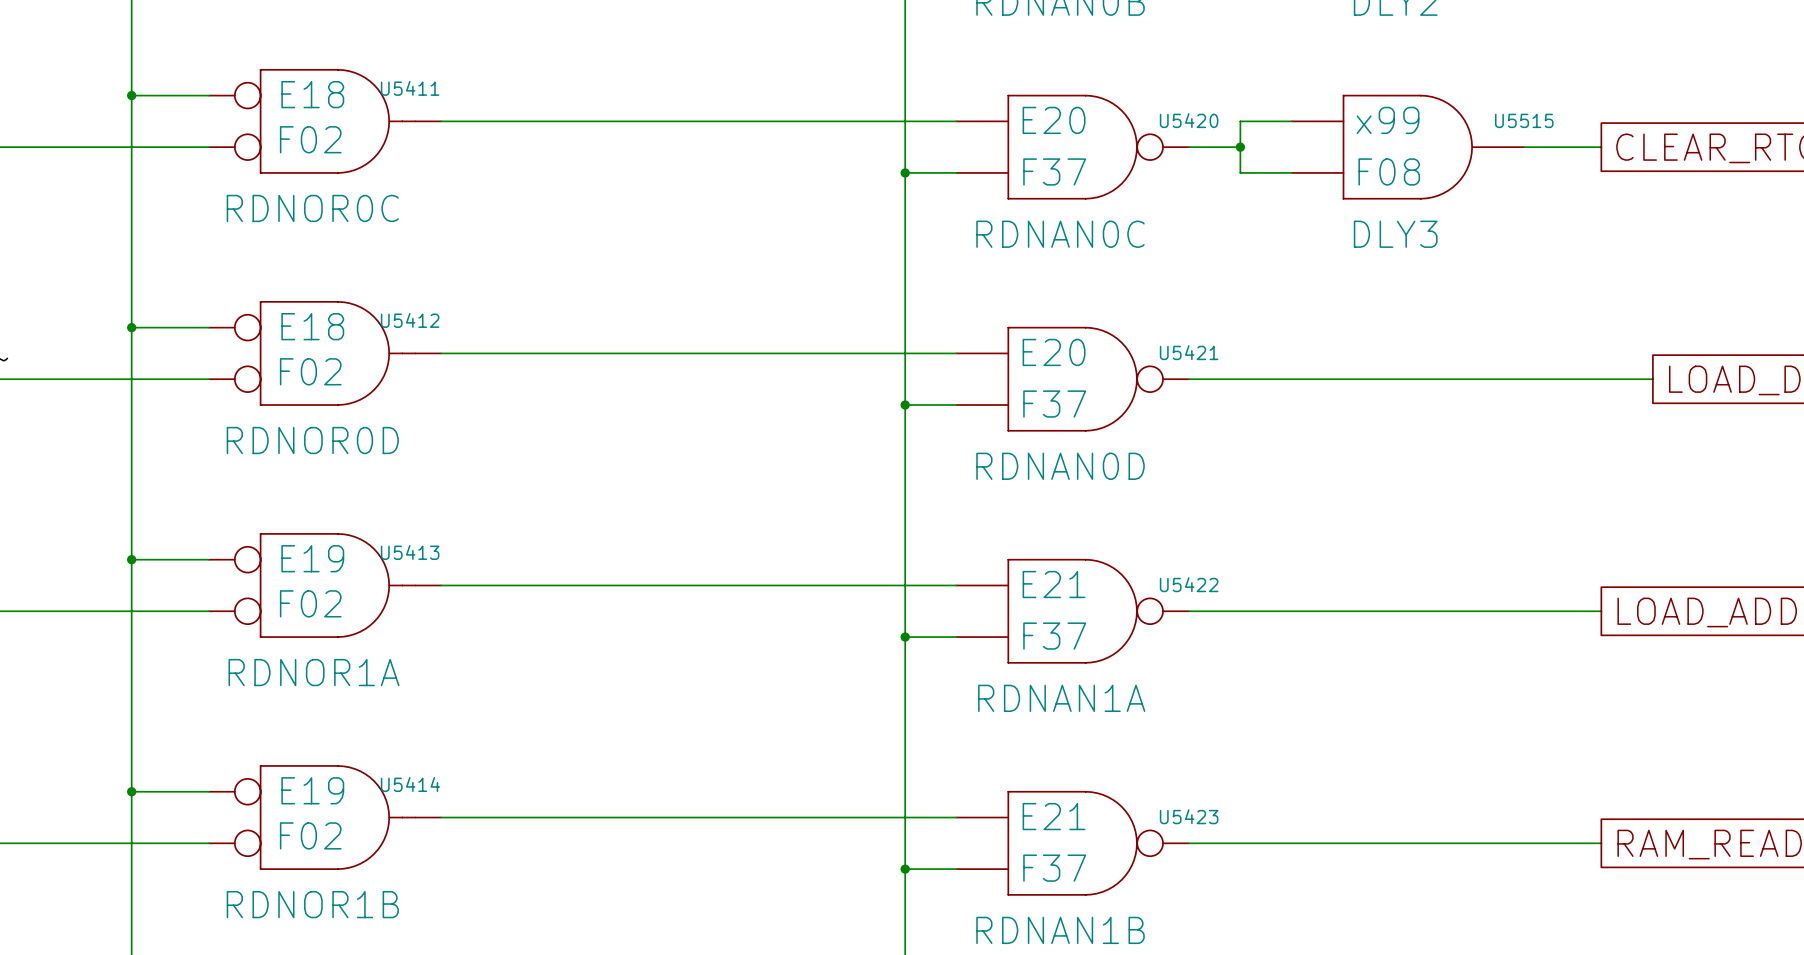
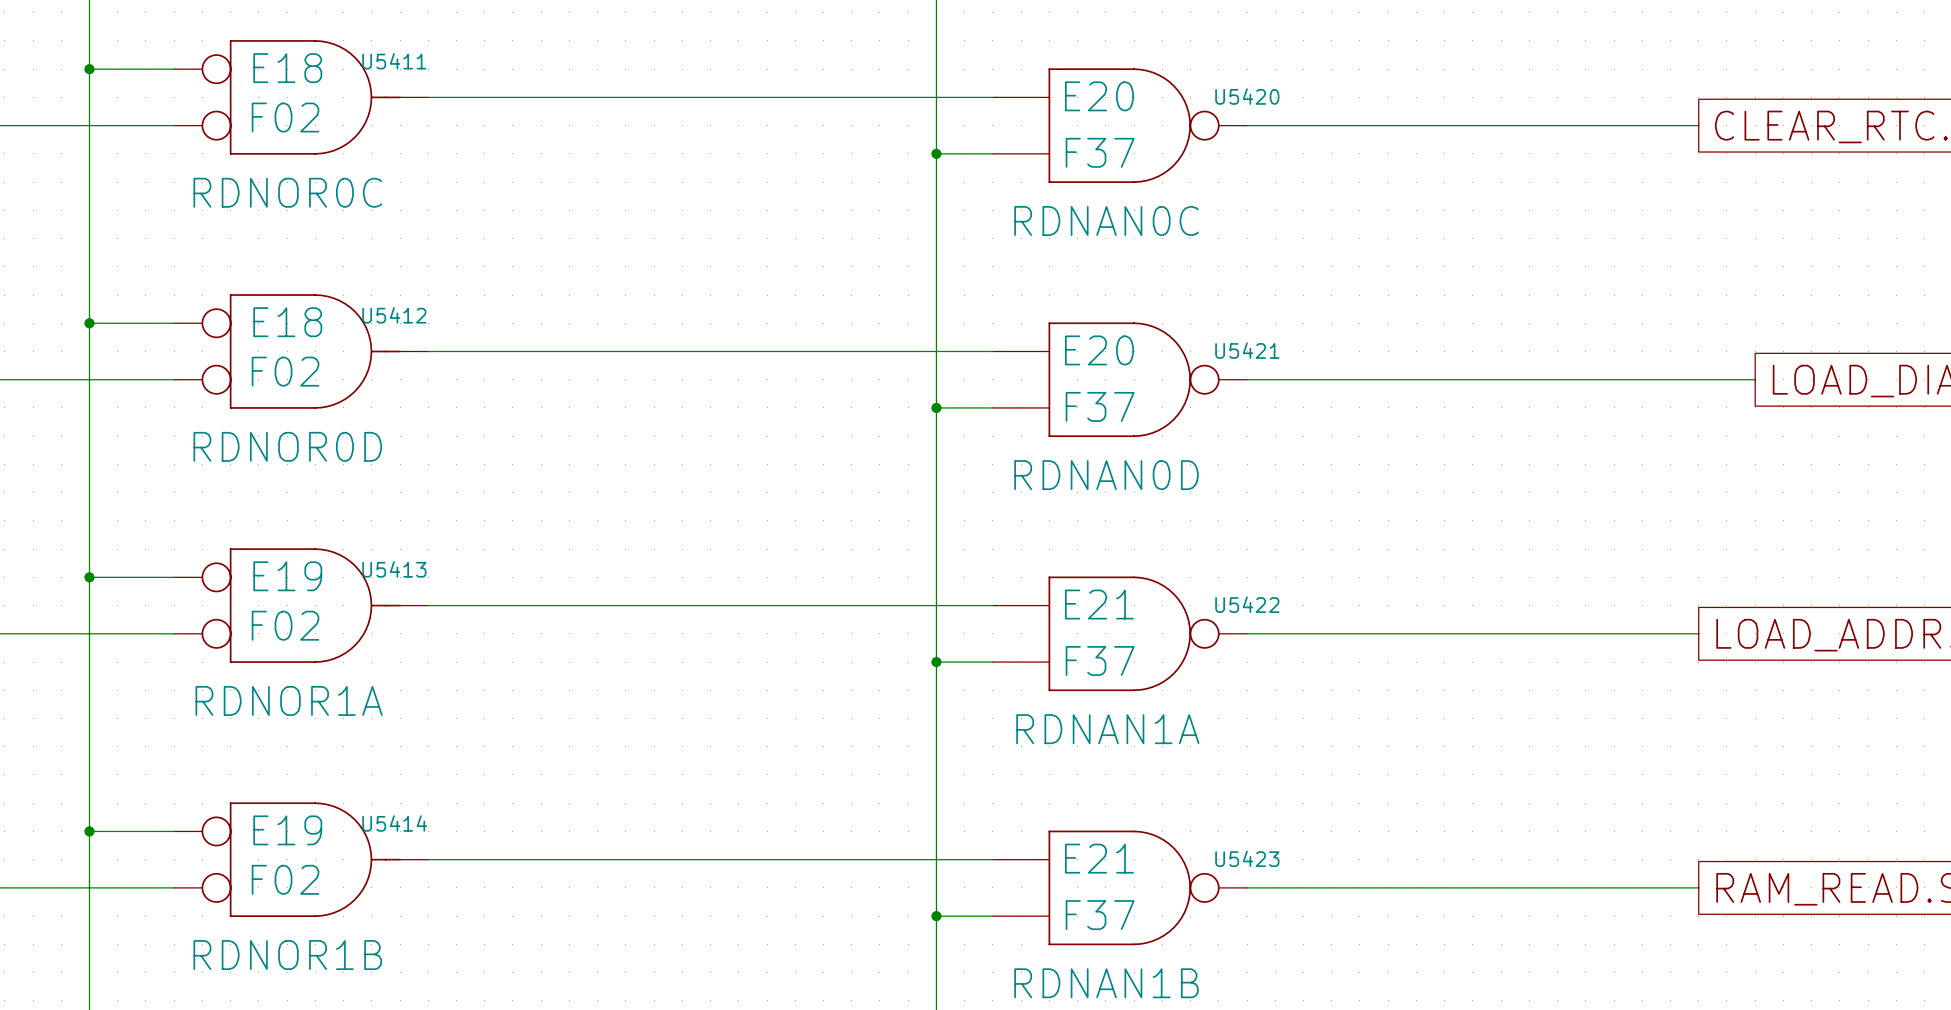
wire: (1291, 121) (1240, 121) (1240, 172) (1291, 172) -> none
wire: none -> (1303, 125) (1614, 125)
junction: (1240, 147) -> none
U5515: F08 (1407, 147) -> none

